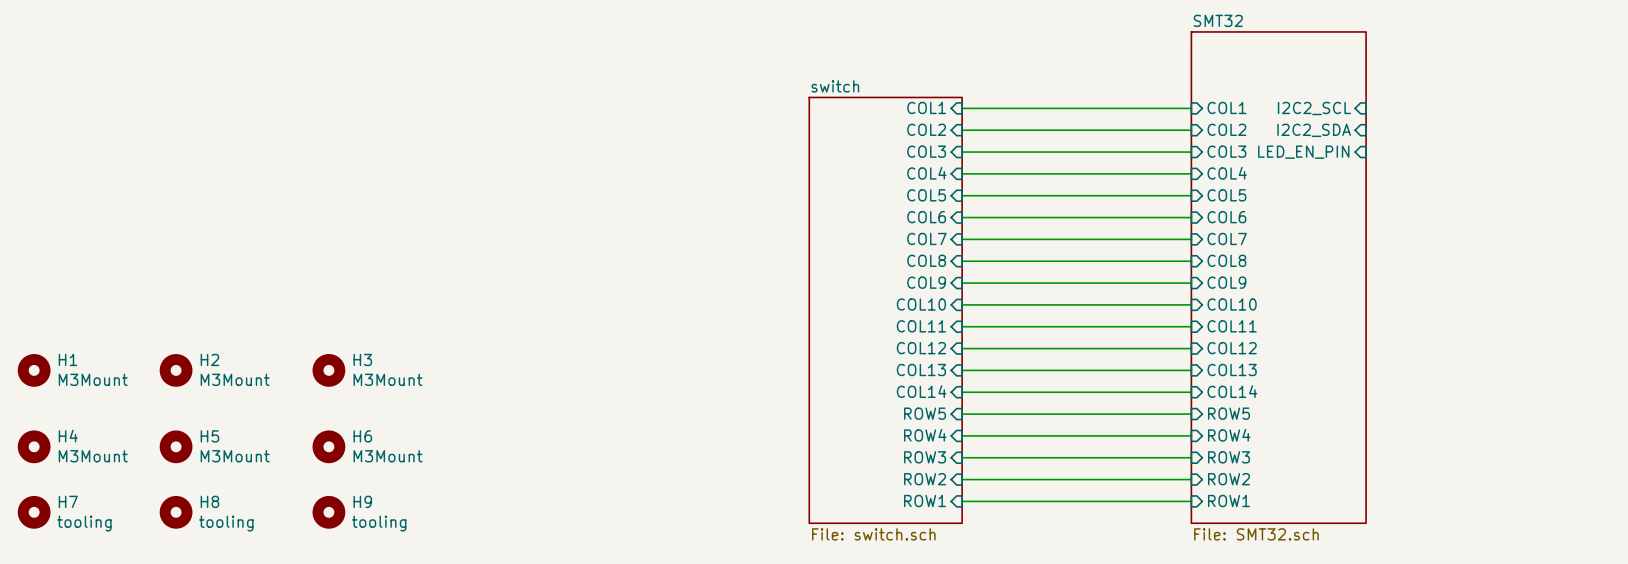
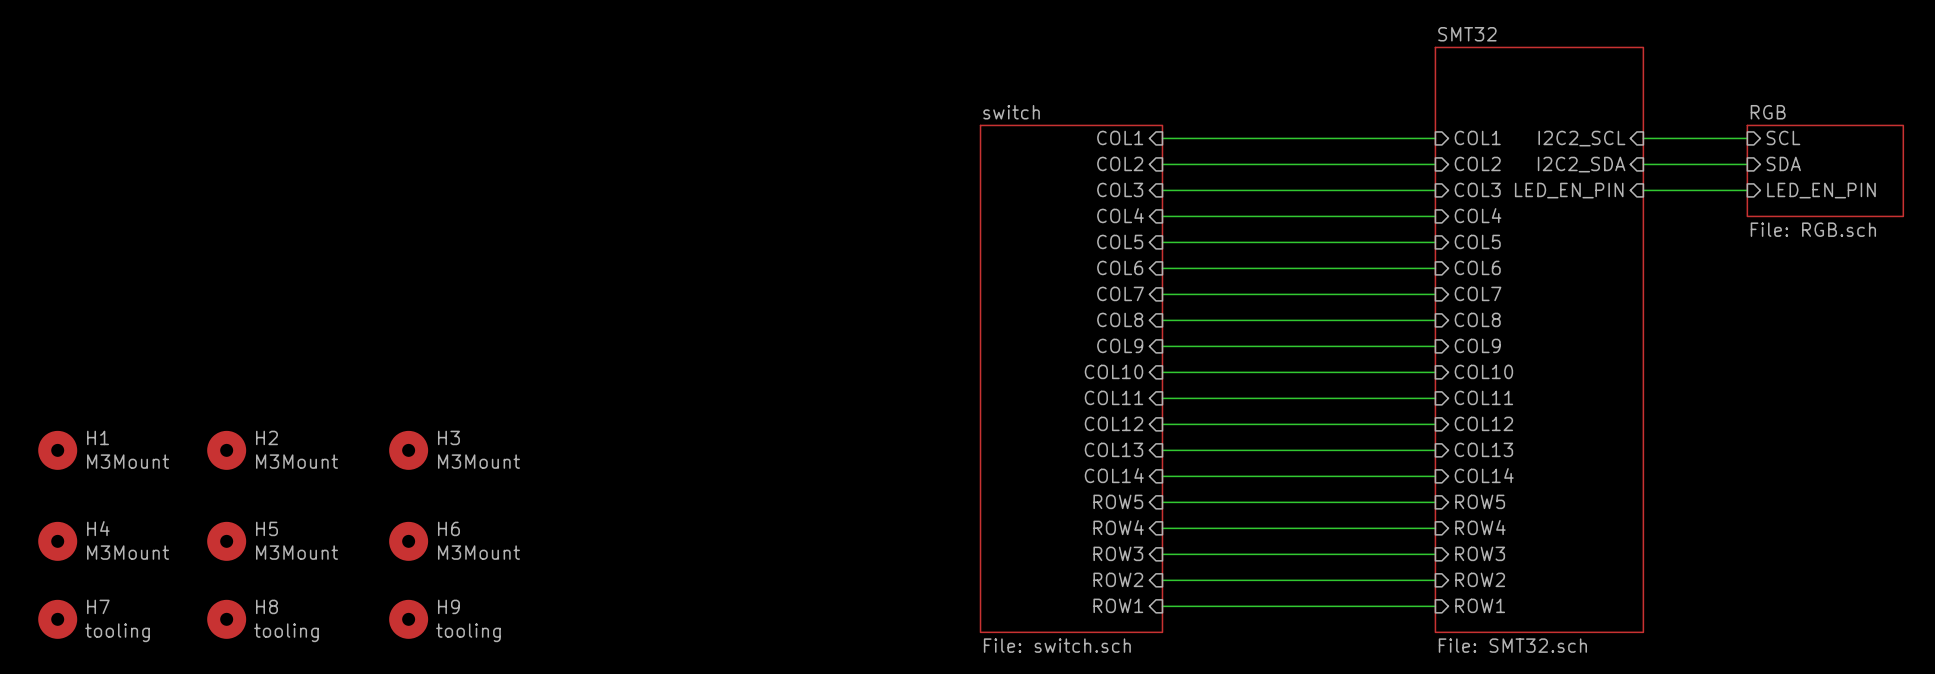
sheet pin: none -> SCL (1783, 137)
wire: none -> (1643, 138) (1747, 138)
sheet pin: none -> SDA (1783, 163)
wire: none -> (1643, 164) (1747, 164)
sheet RGB: none -> File: RGB.sch (1825, 170)
wire: none -> (1643, 190) (1747, 190)
sheet pin: none -> LED_EN_PIN (1821, 190)

